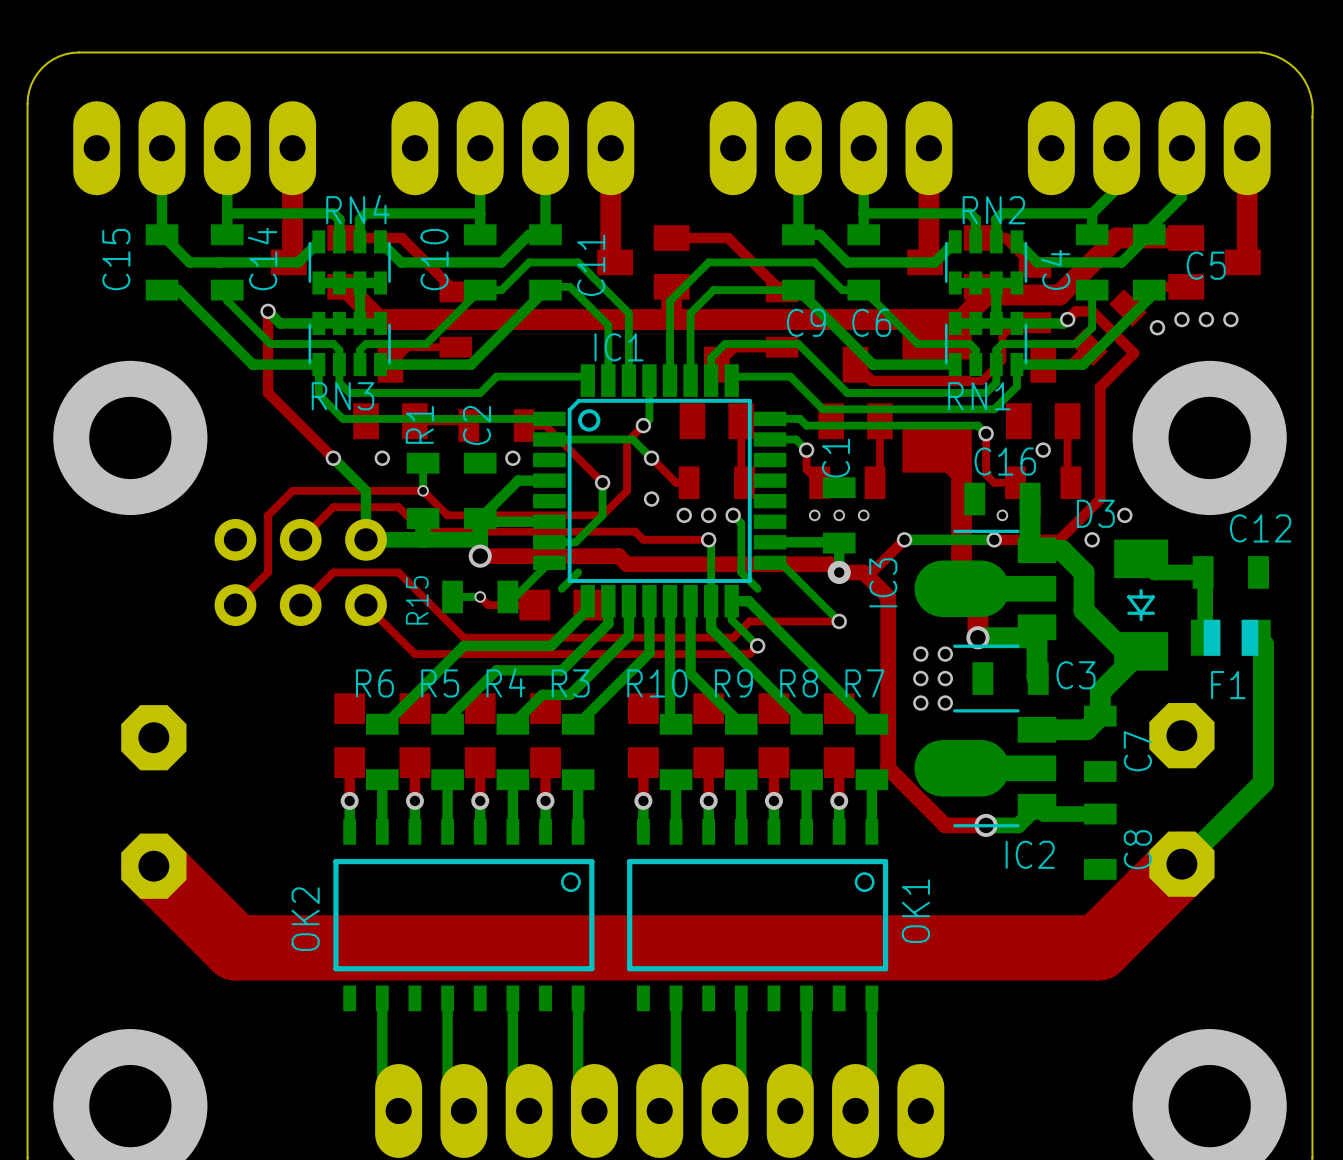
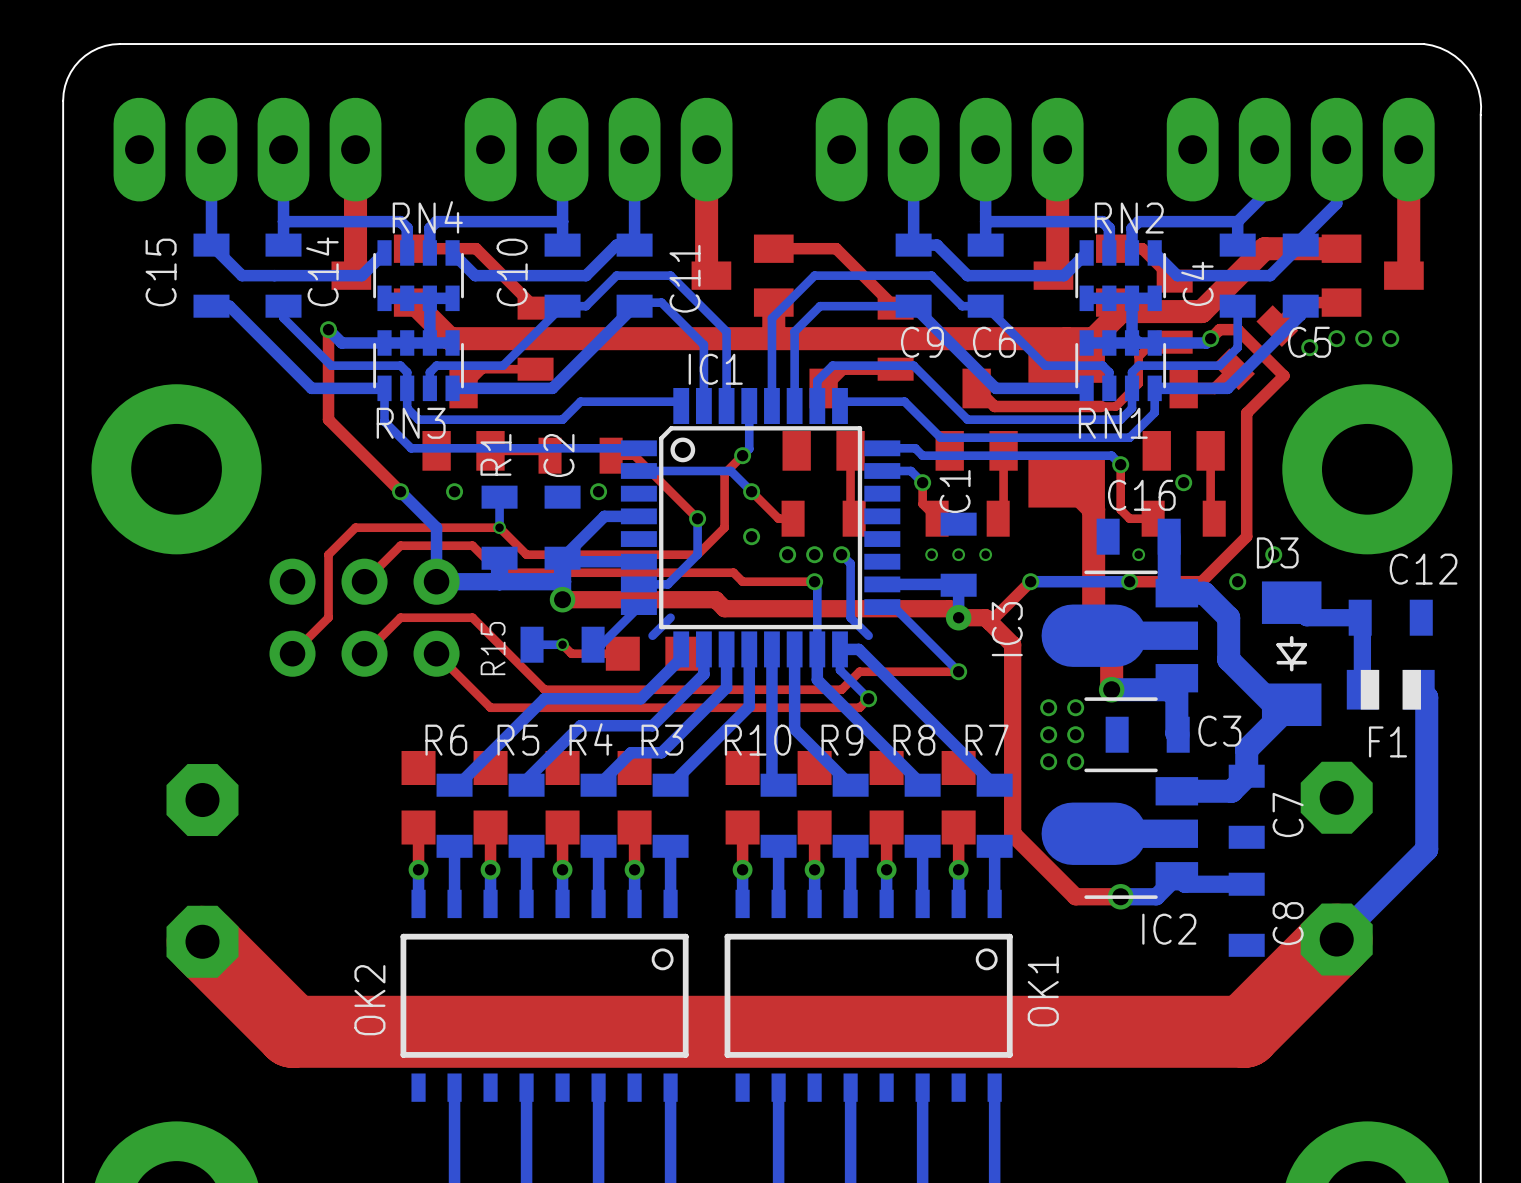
C5 name position: C5 (1206, 265) -> C5 (1309, 342)
D3 name position: D3 (1095, 513) -> D3 (1277, 552)

